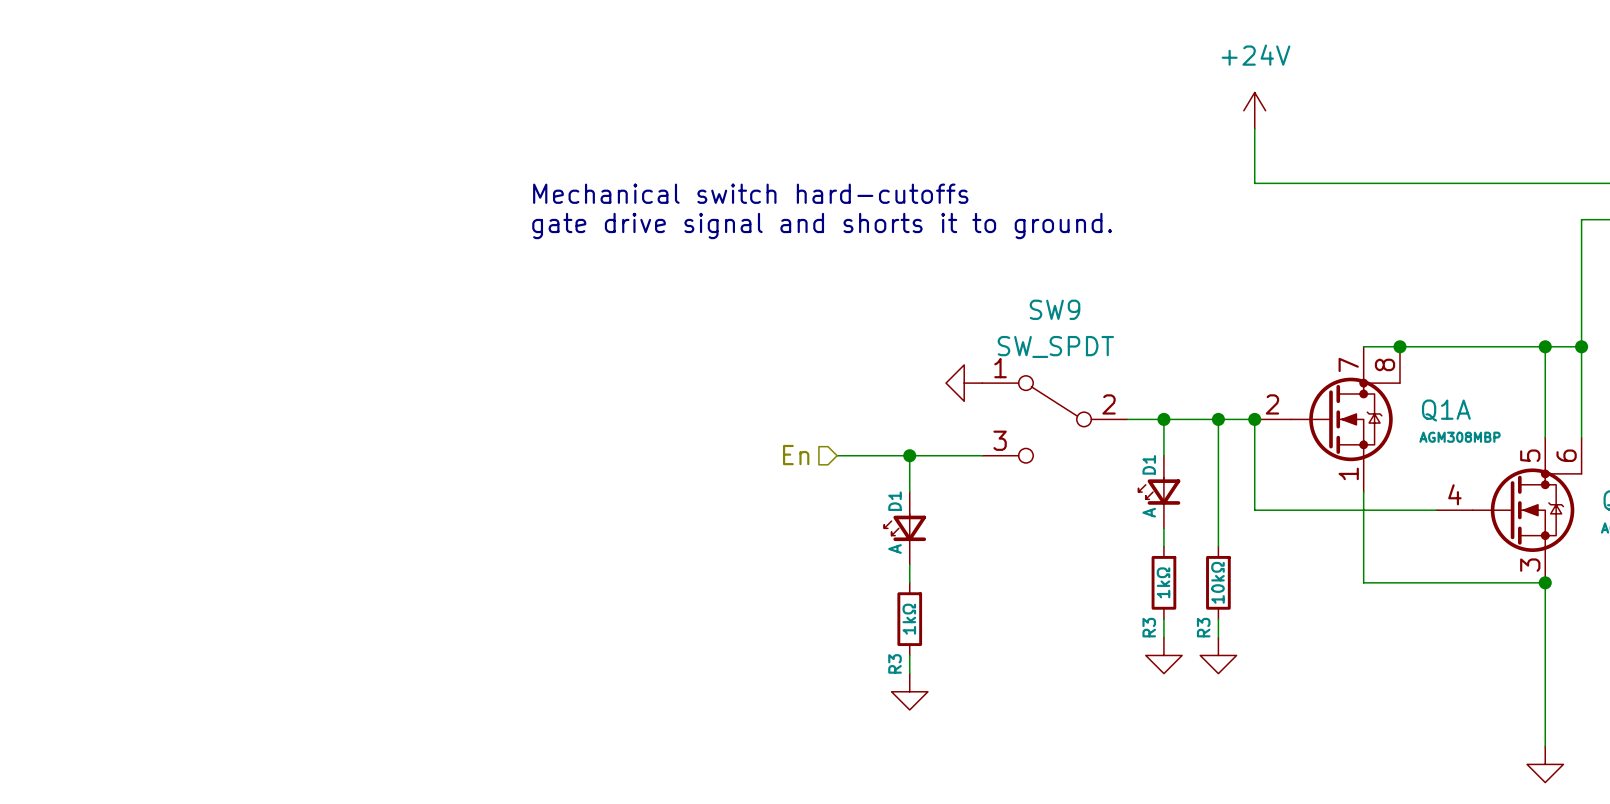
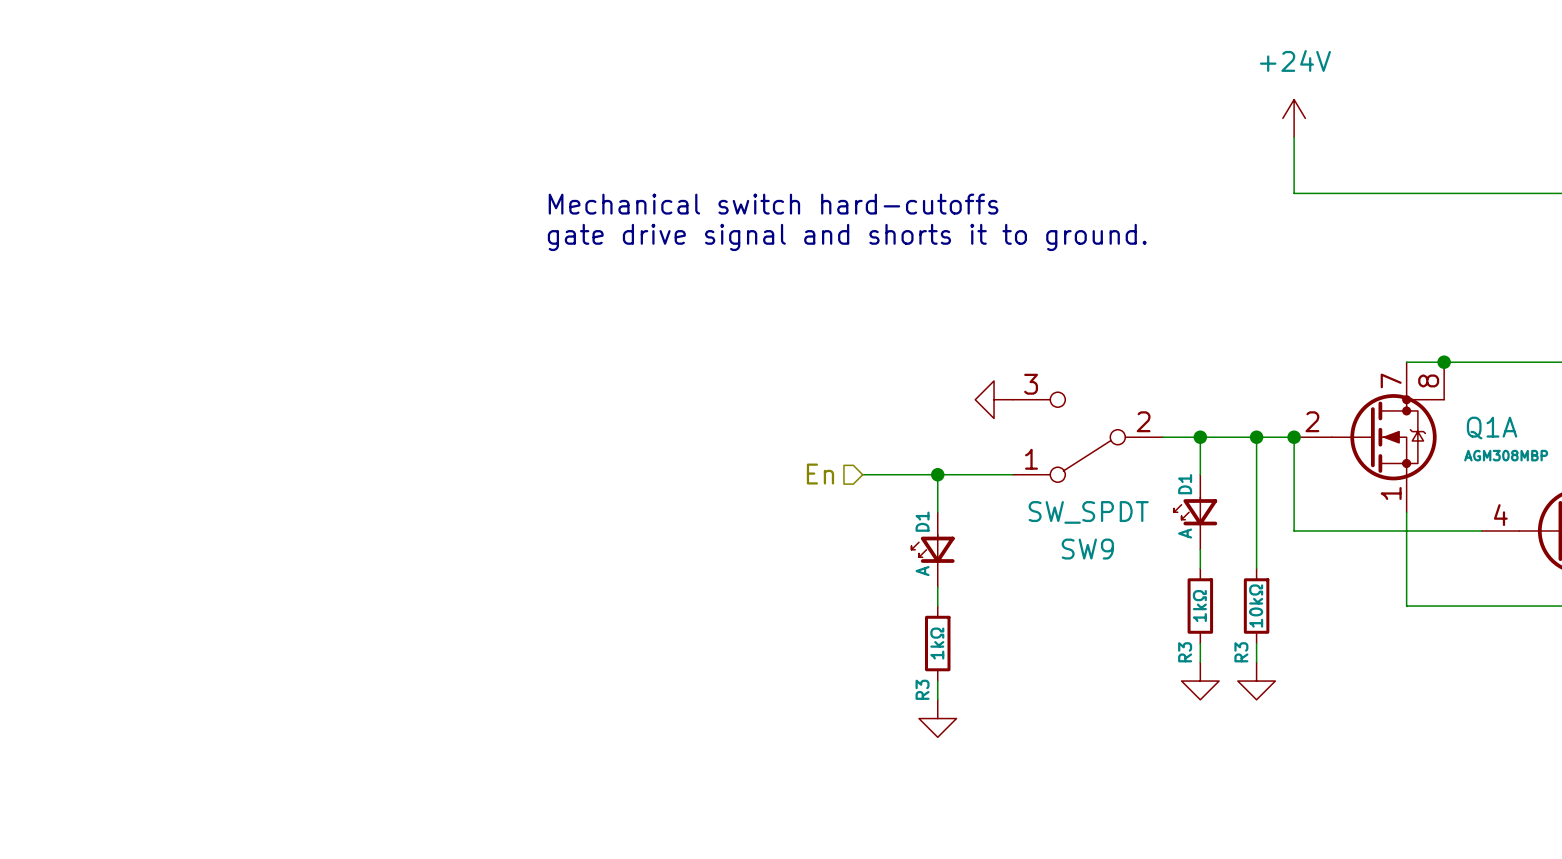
SW9 flip: as is (1054, 419) -> up-down (1087, 437)

